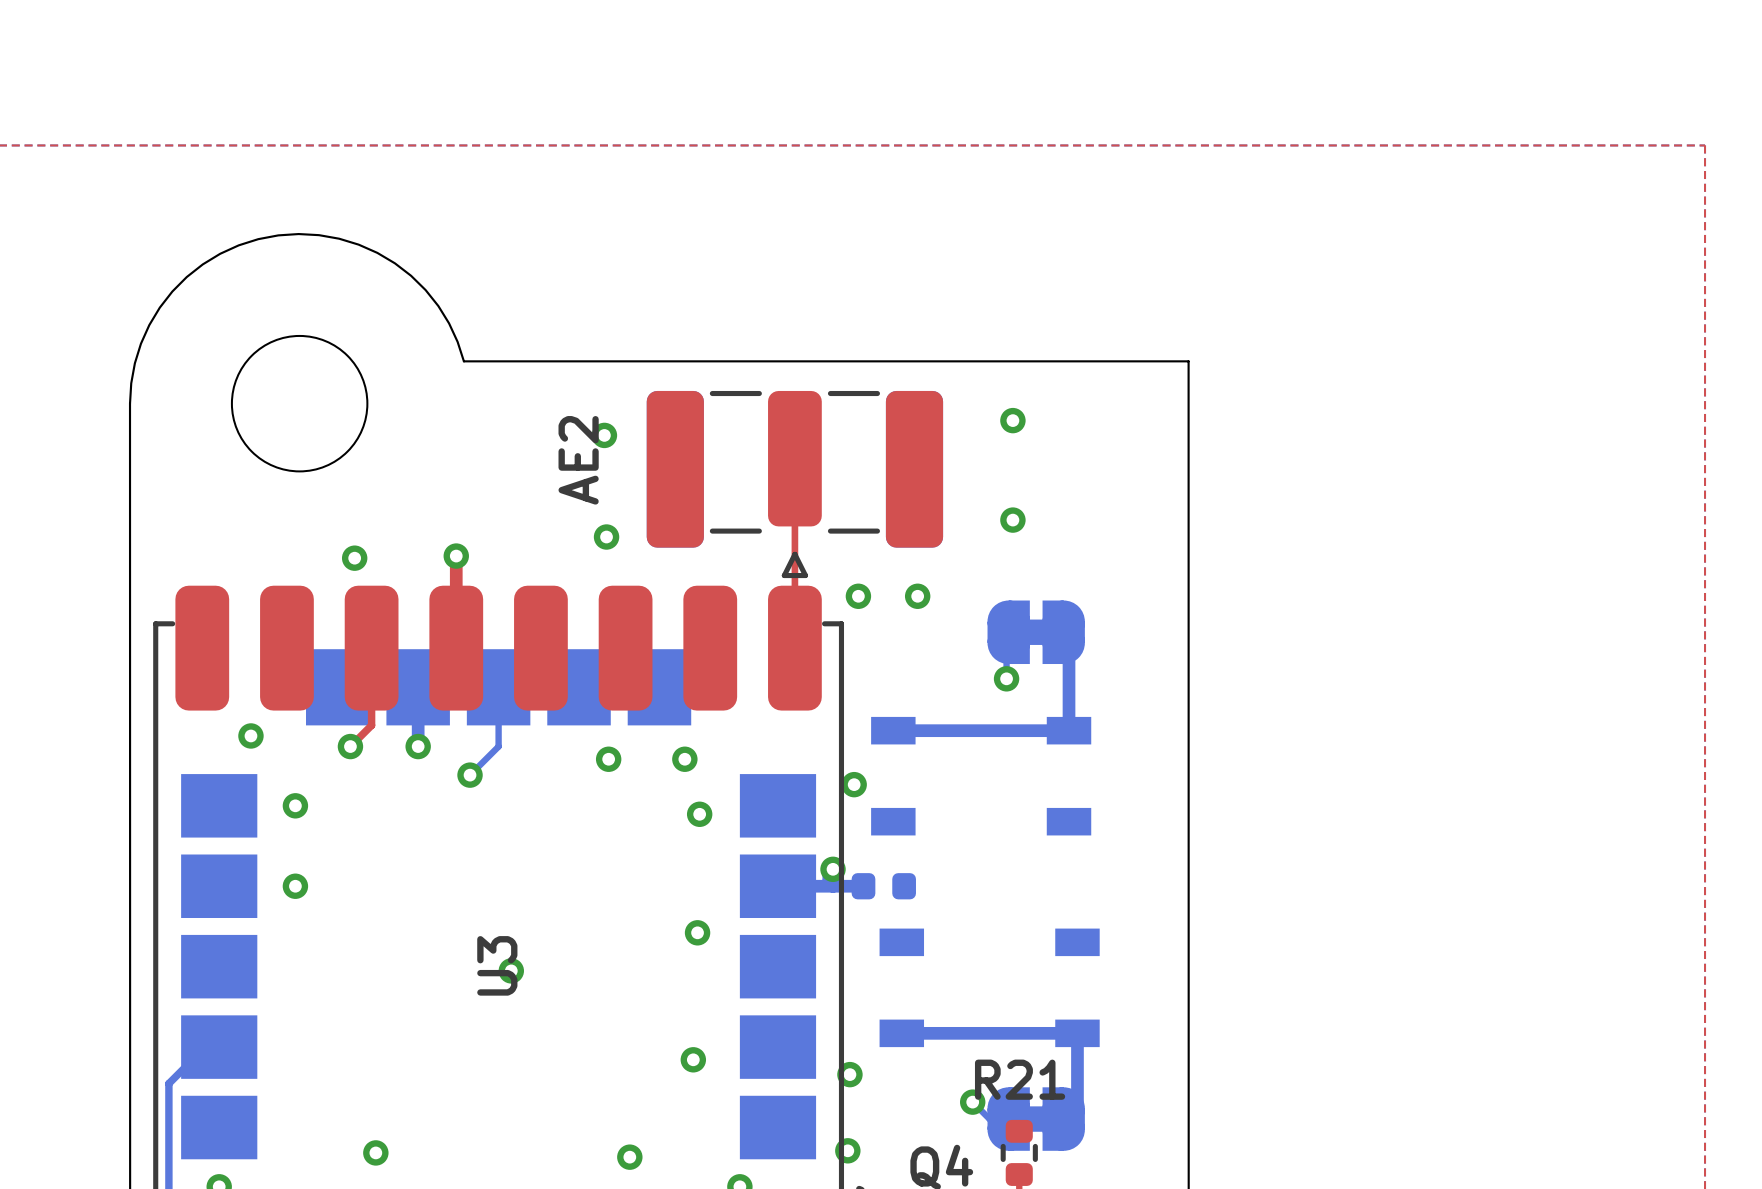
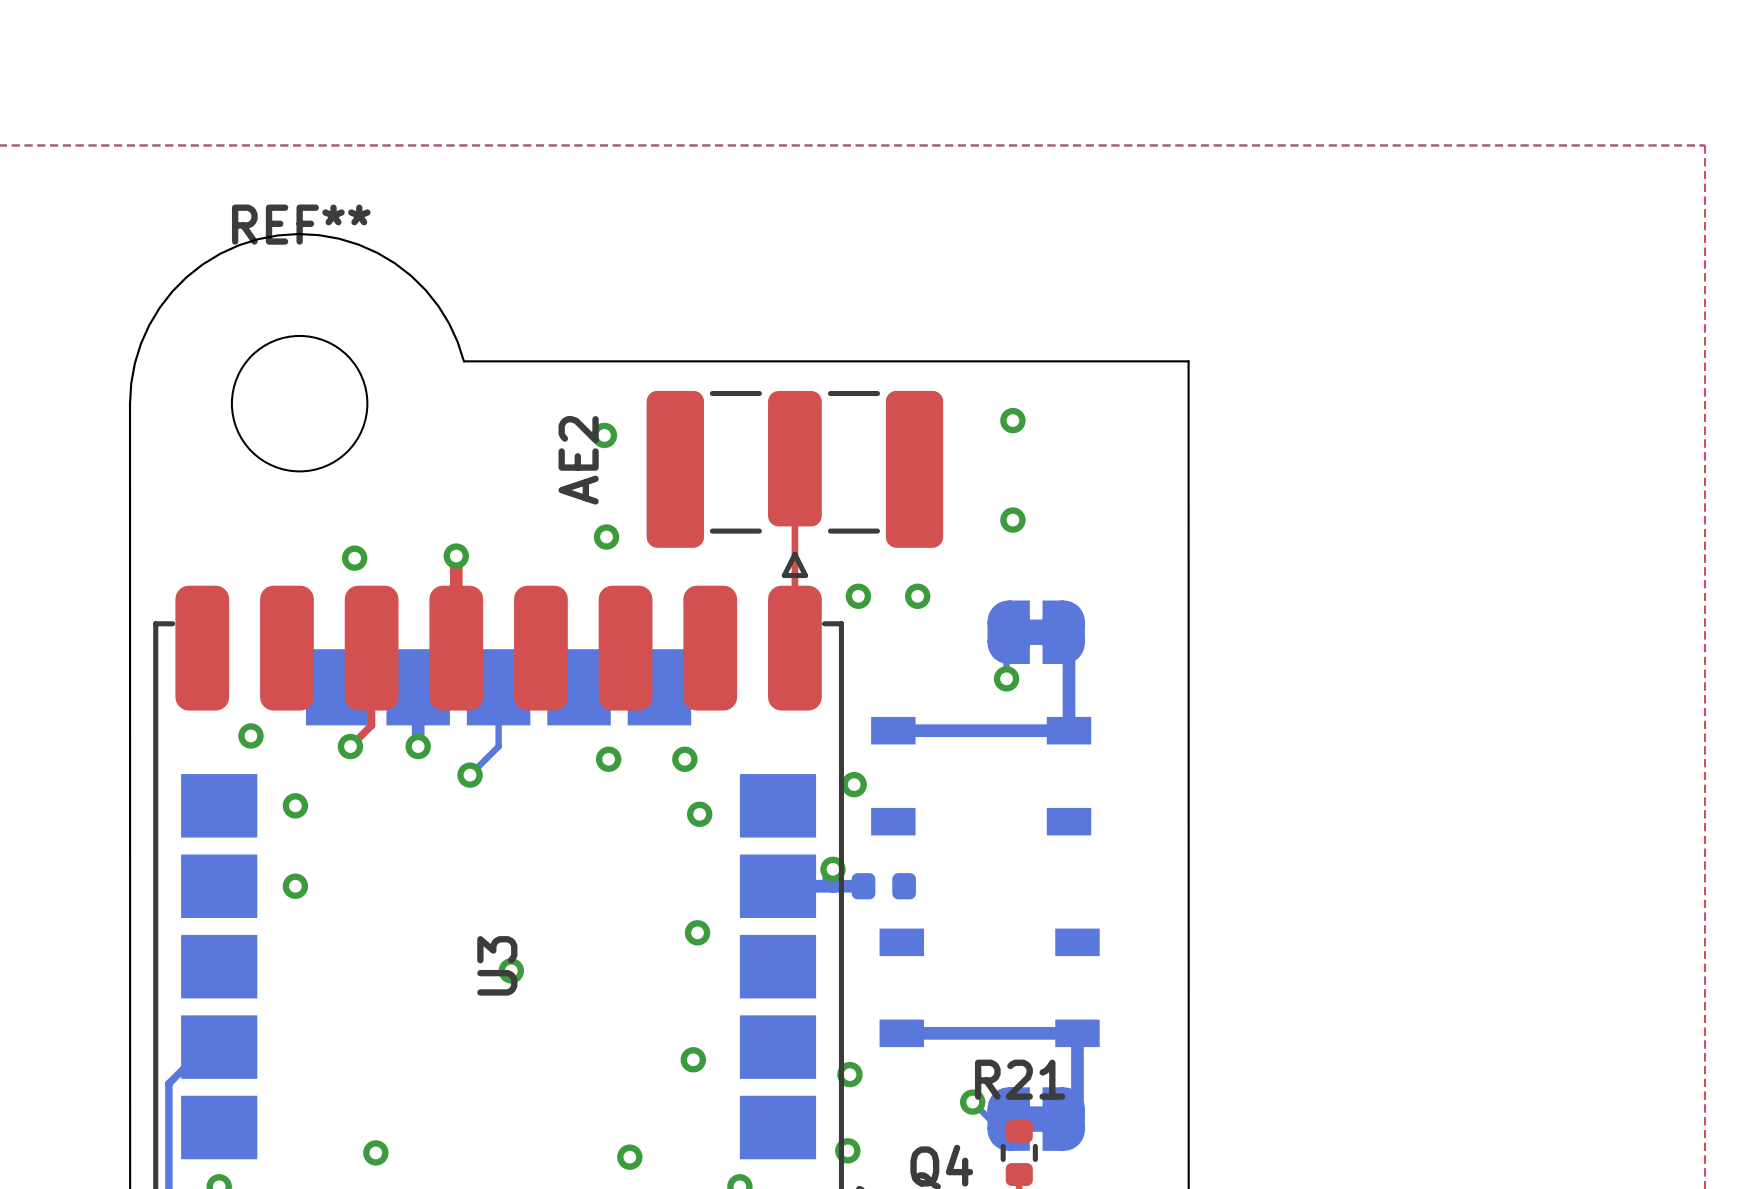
REF** name: none -> REF** (301, 224)

